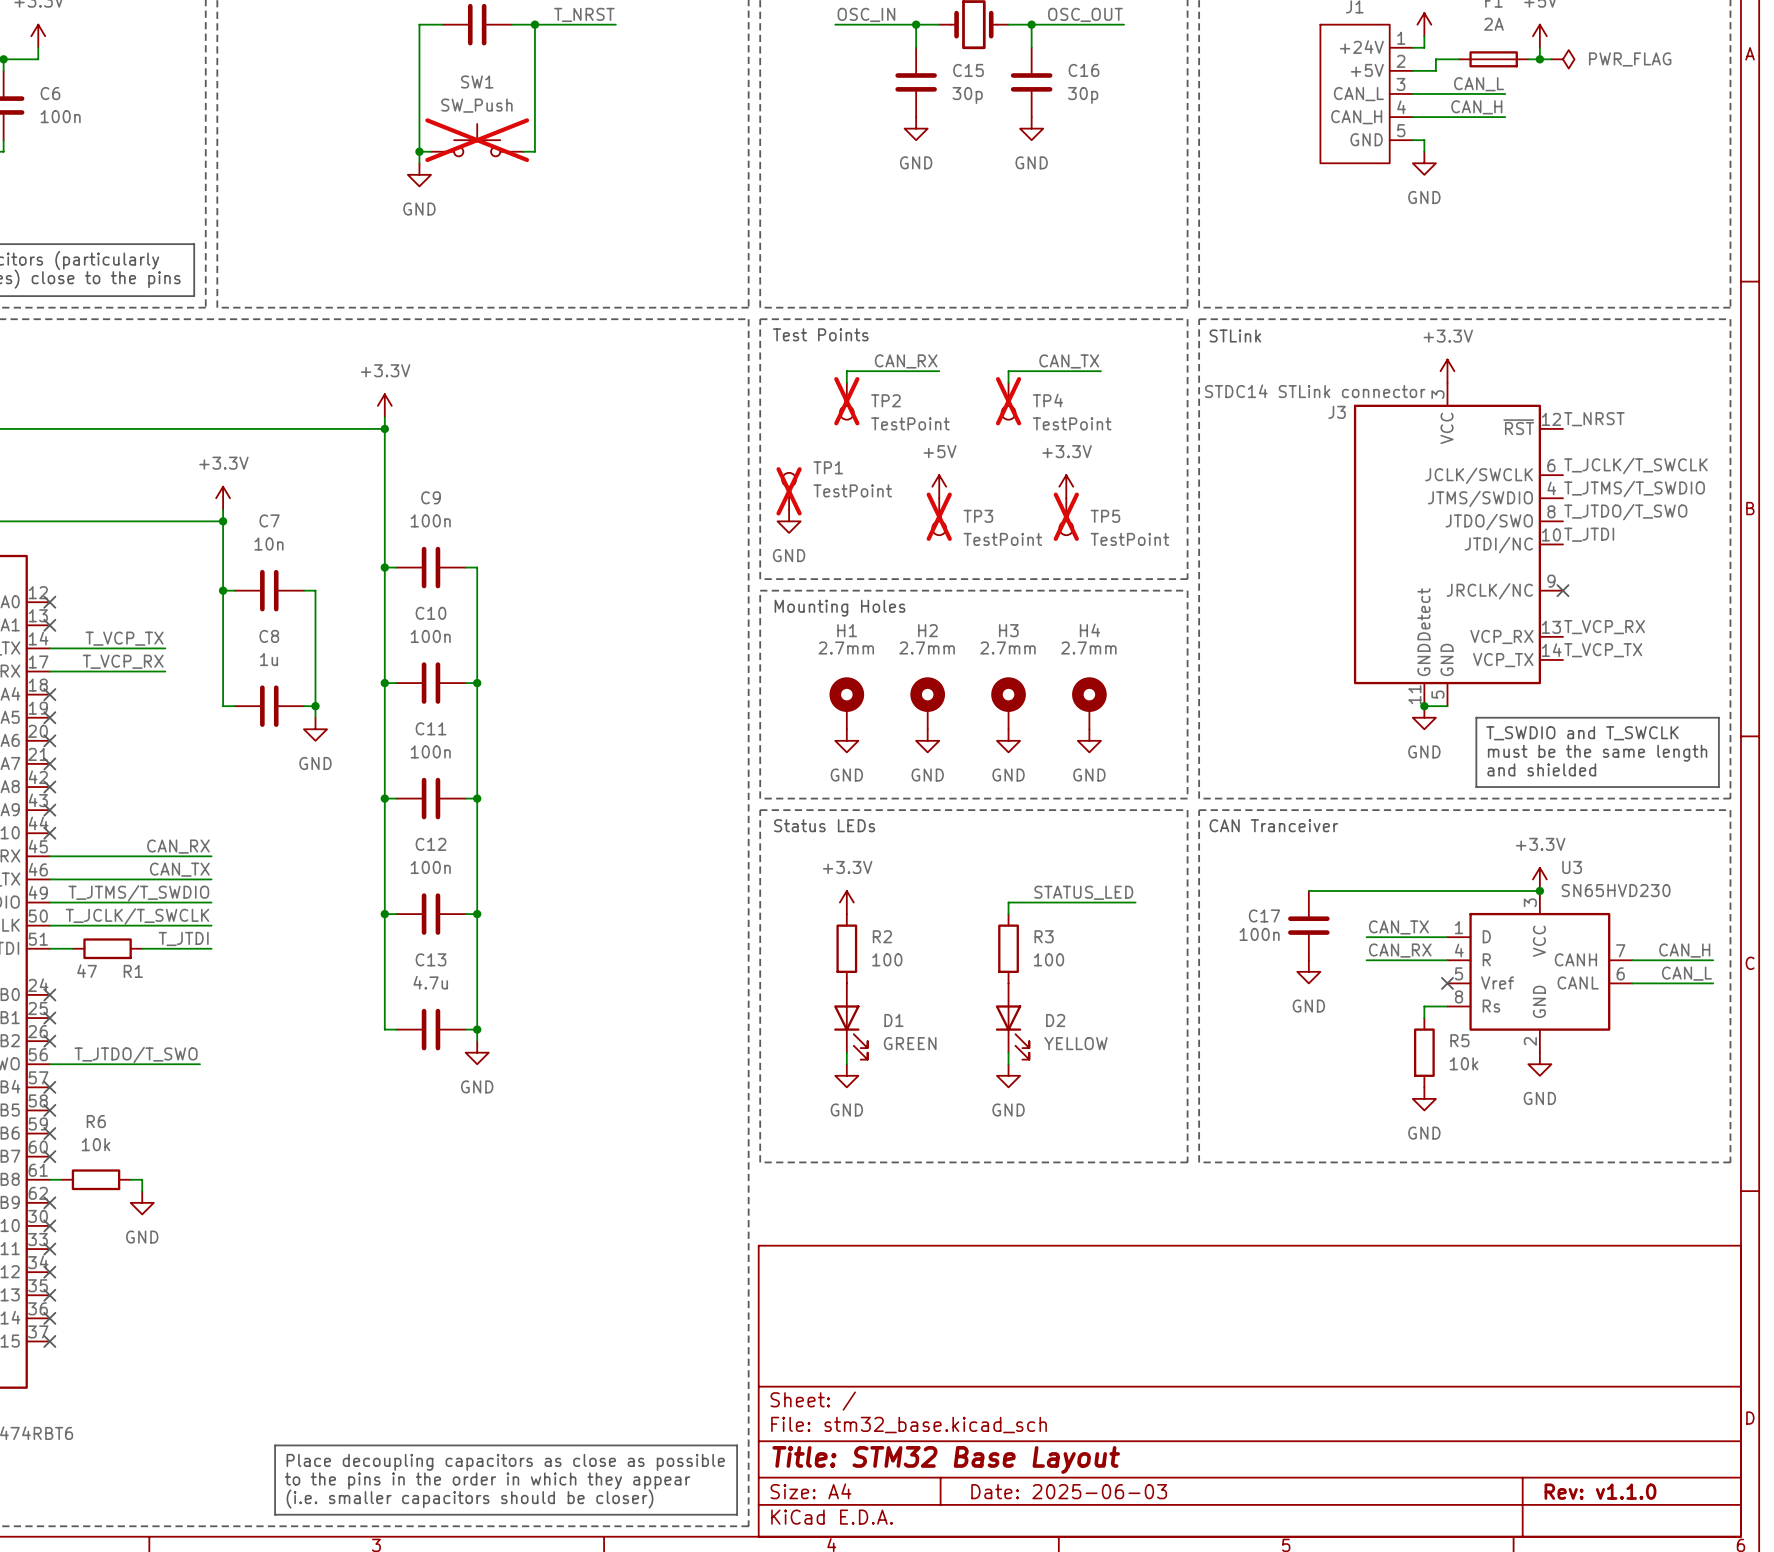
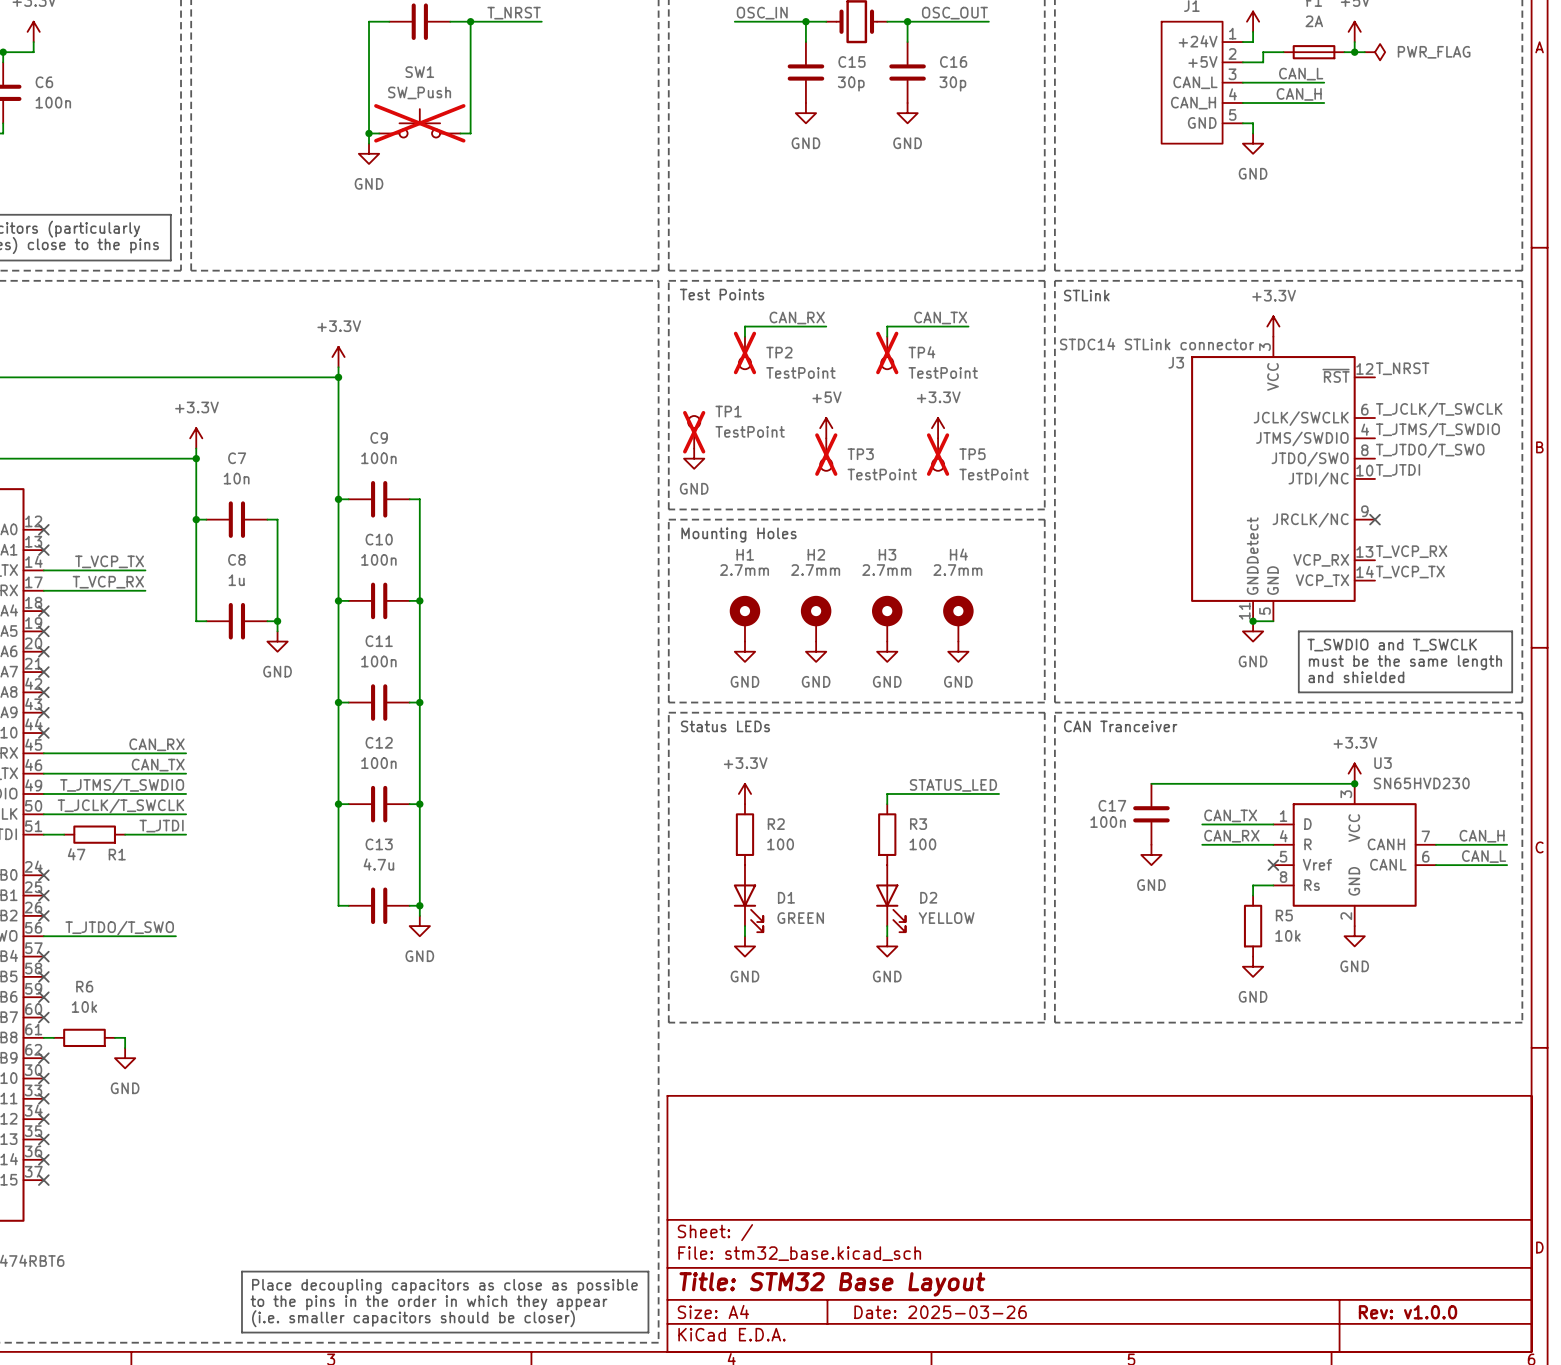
title block: Date: 2025-06-03 (1069, 1491) -> Date: 2025-03-26 (940, 1312)
title block: Rev: v1.1.0 (1600, 1491) -> Rev: v1.0.0 (1408, 1312)

